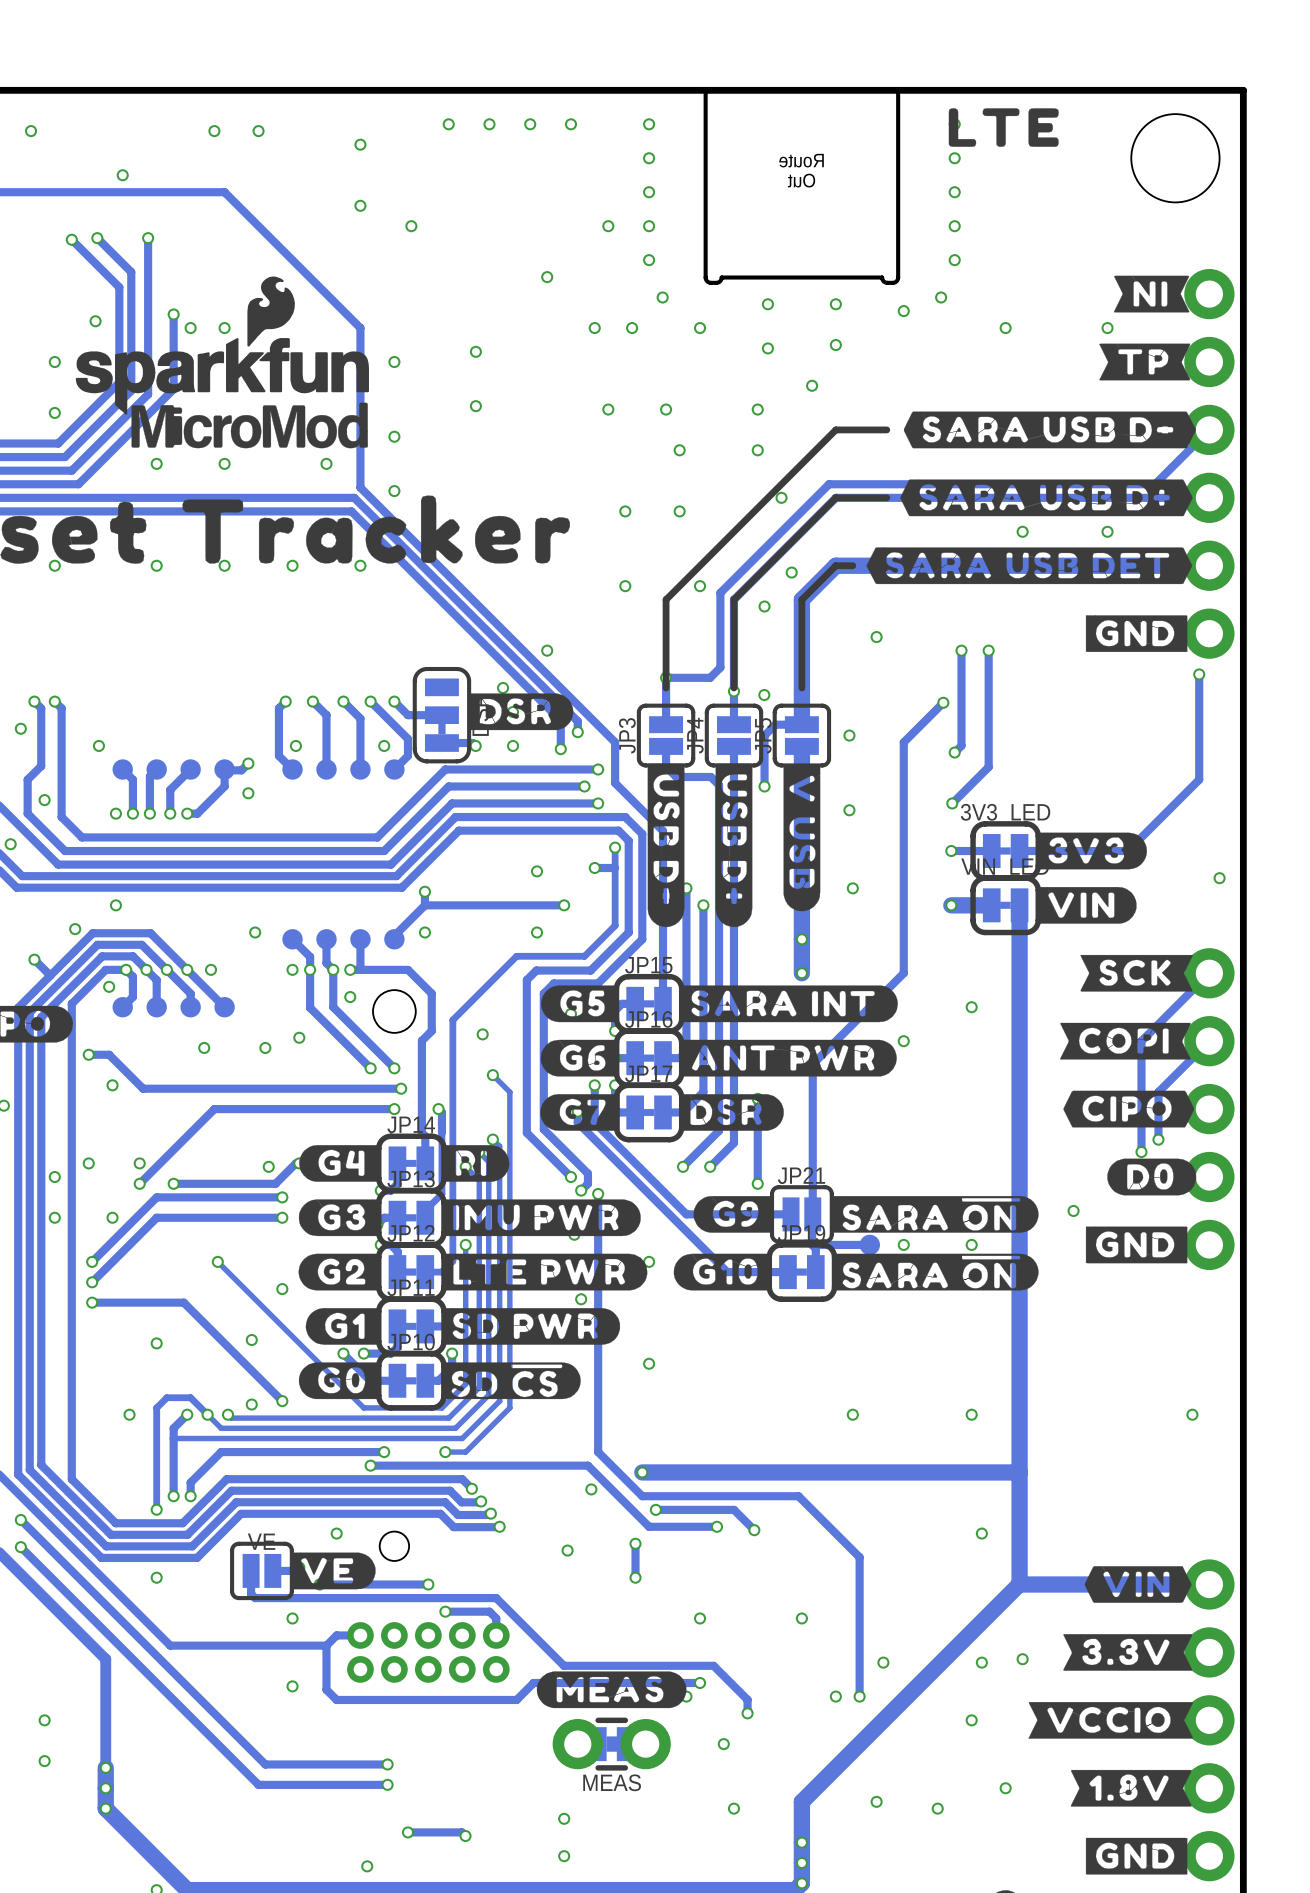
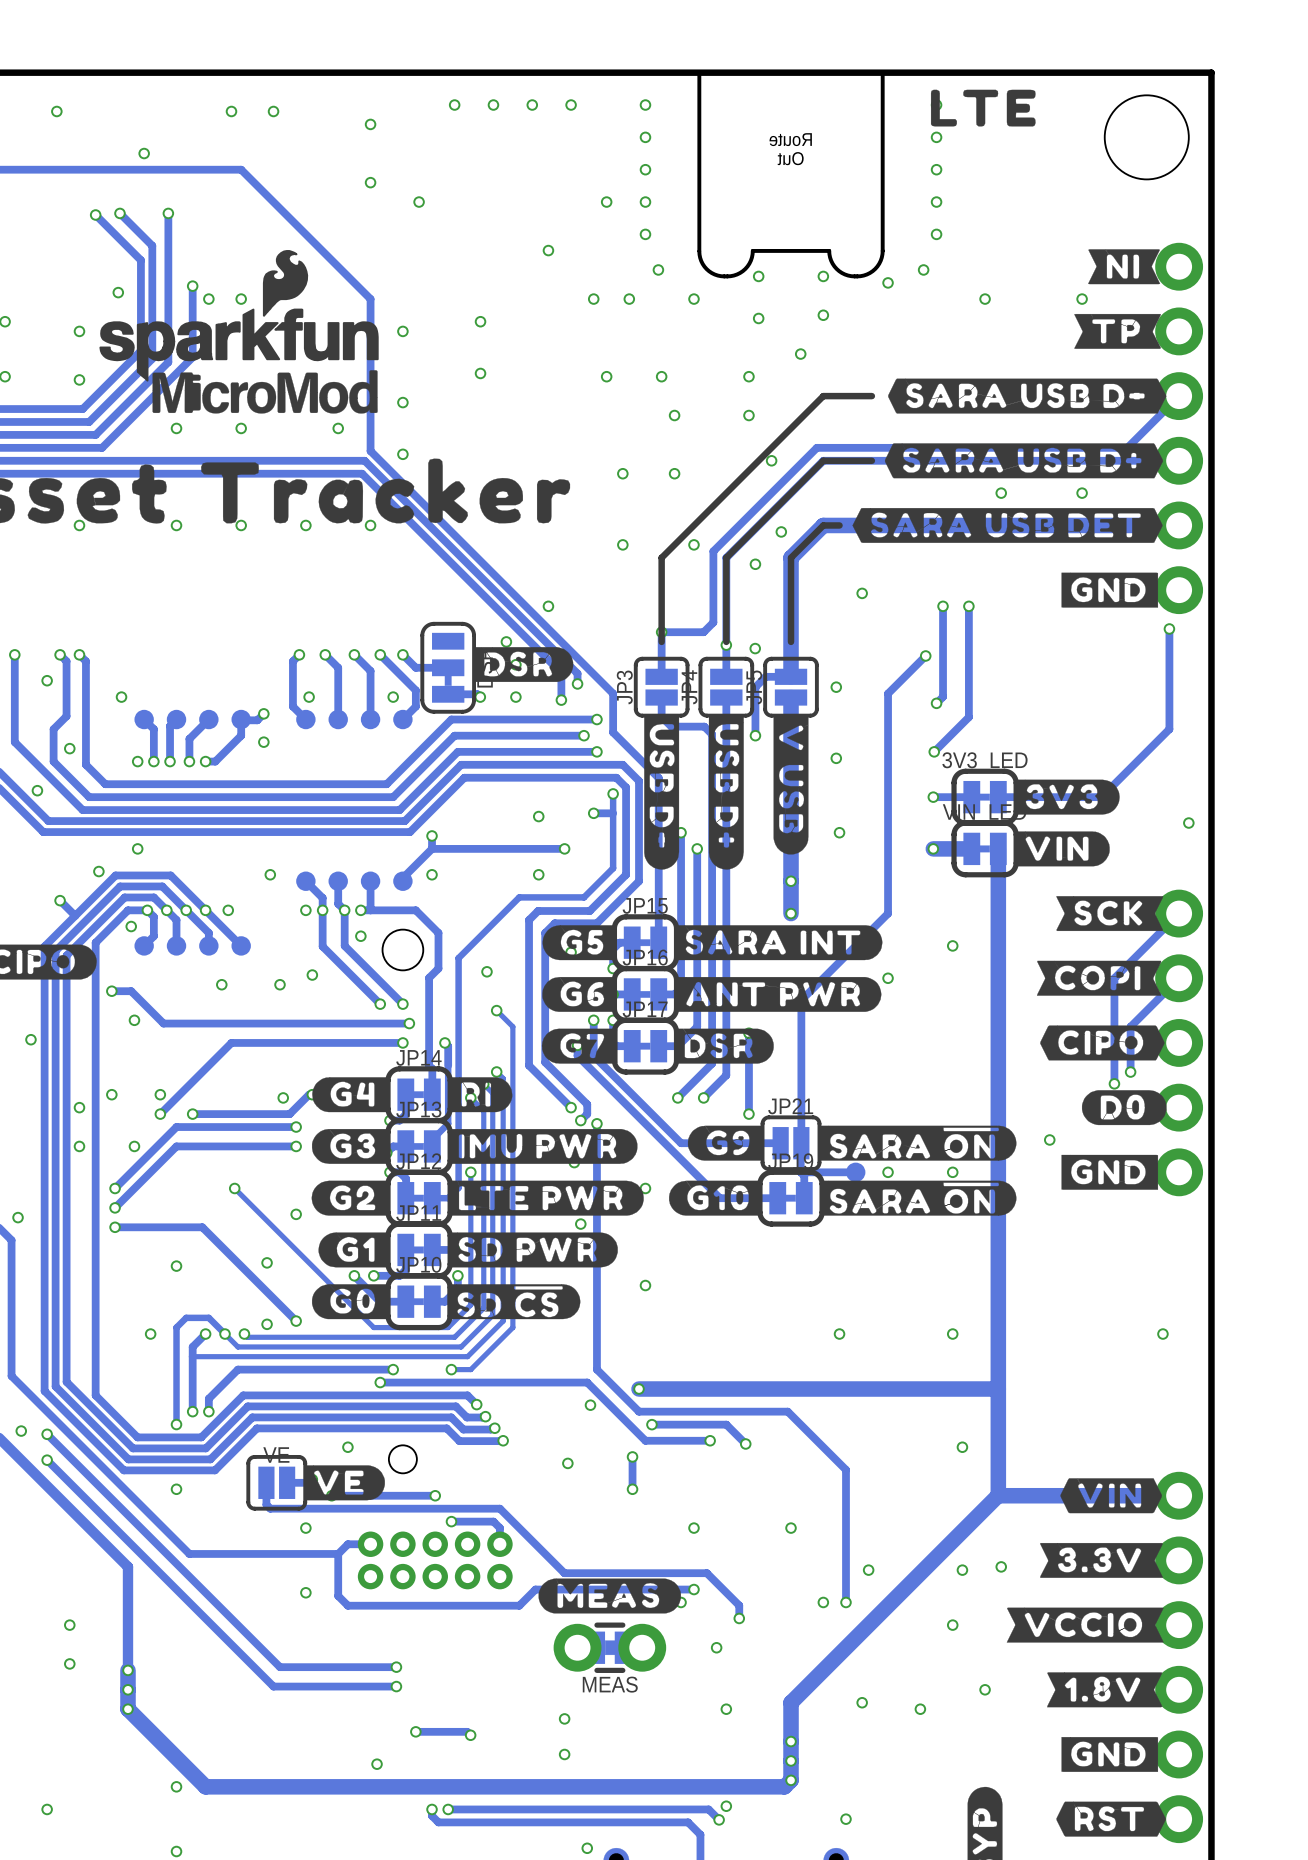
part footprint: [703, 88, 901, 285] -> [697, 70, 885, 279]

